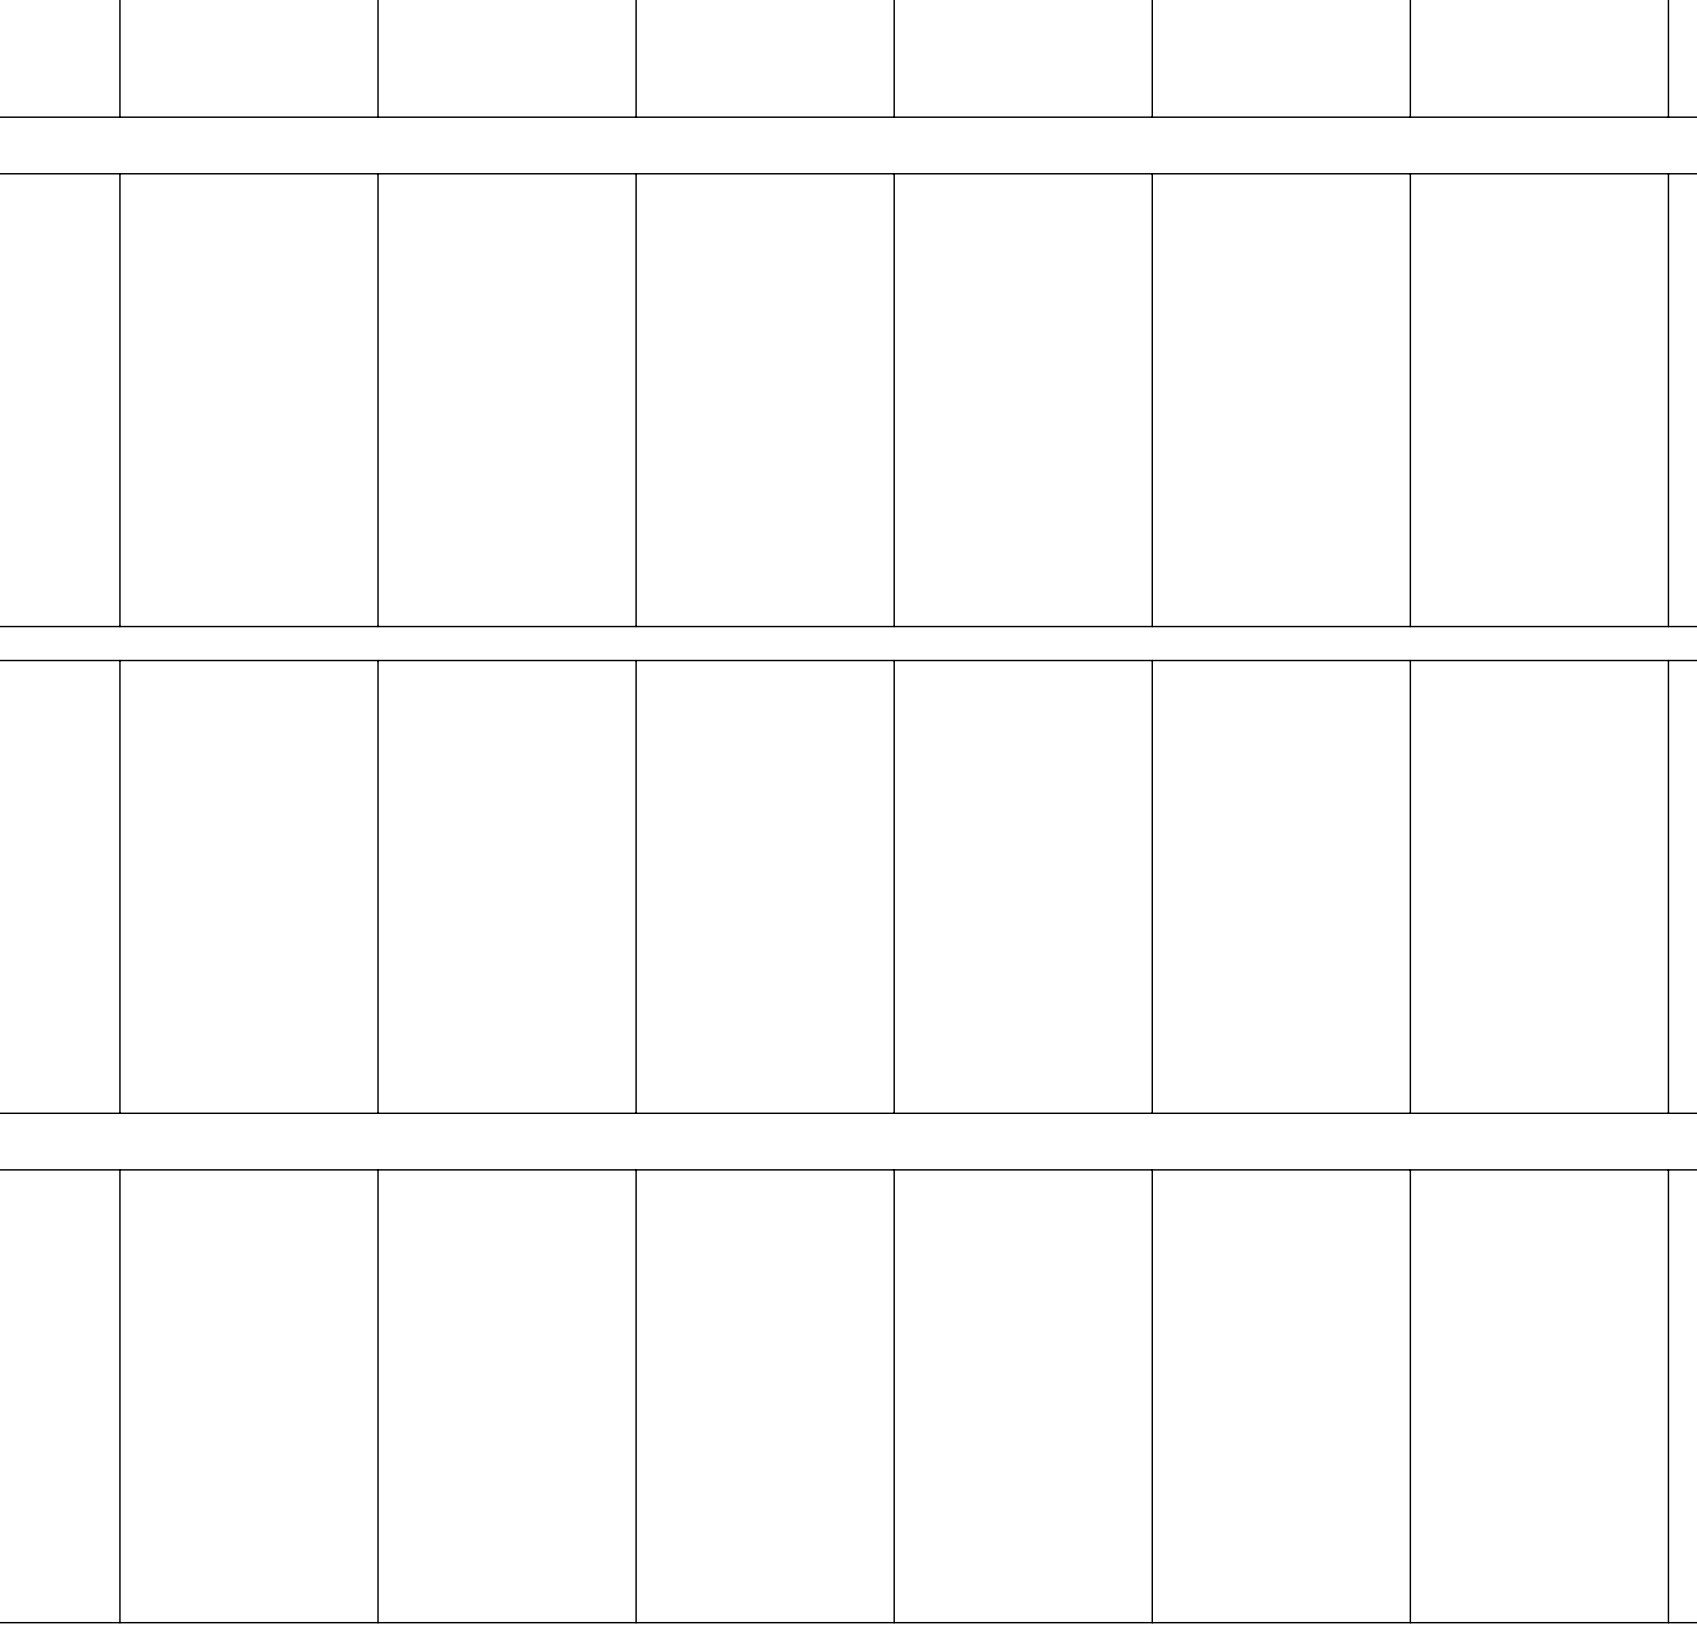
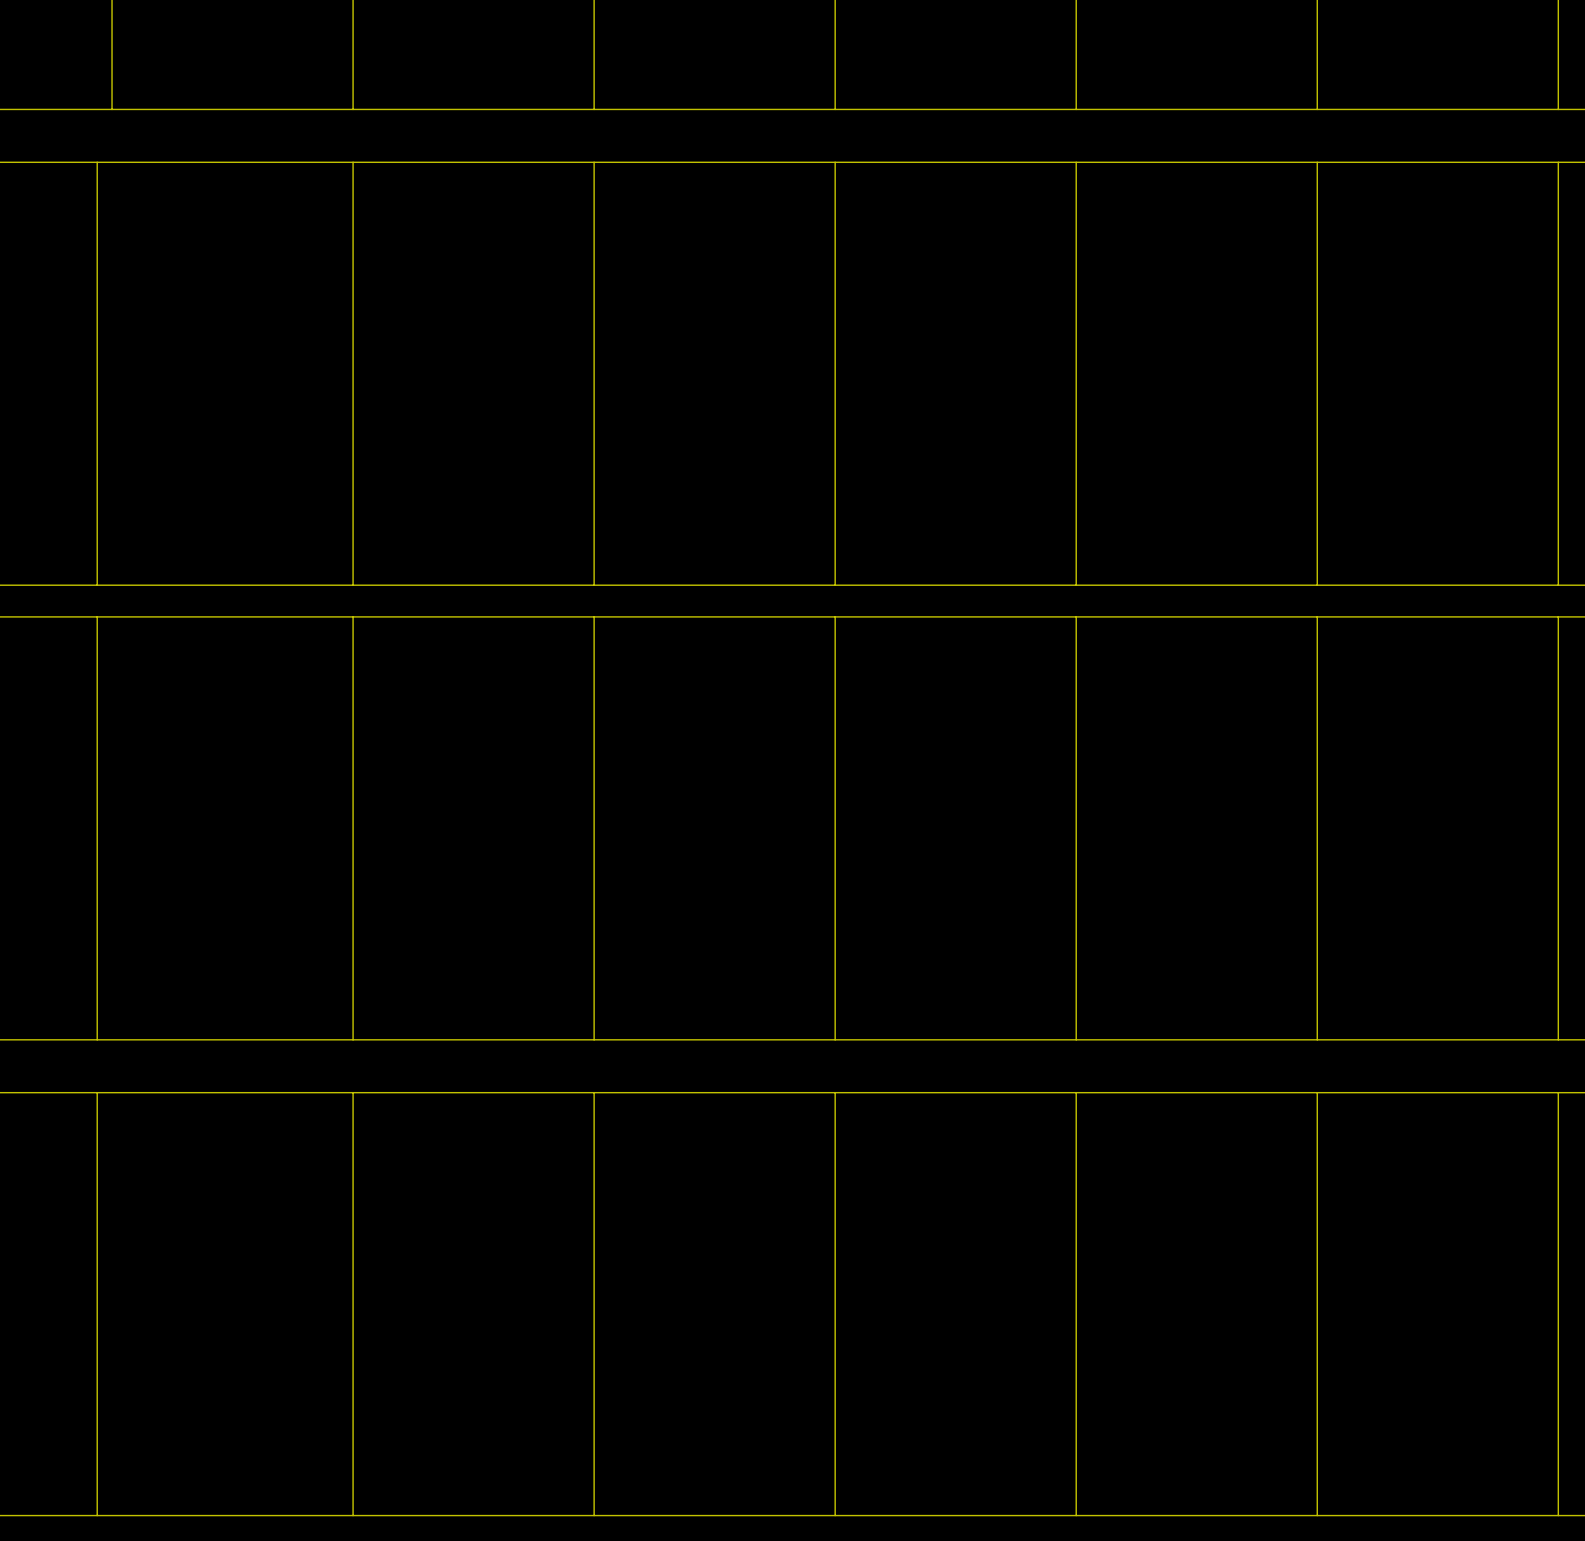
board edge: (119, 173) (119, 626) -> (97, 162) (97, 585)
board edge: (119, 660) (119, 1113) -> (97, 616) (97, 1039)
board edge: (119, 1169) (119, 1622) -> (97, 1092) (97, 1515)

